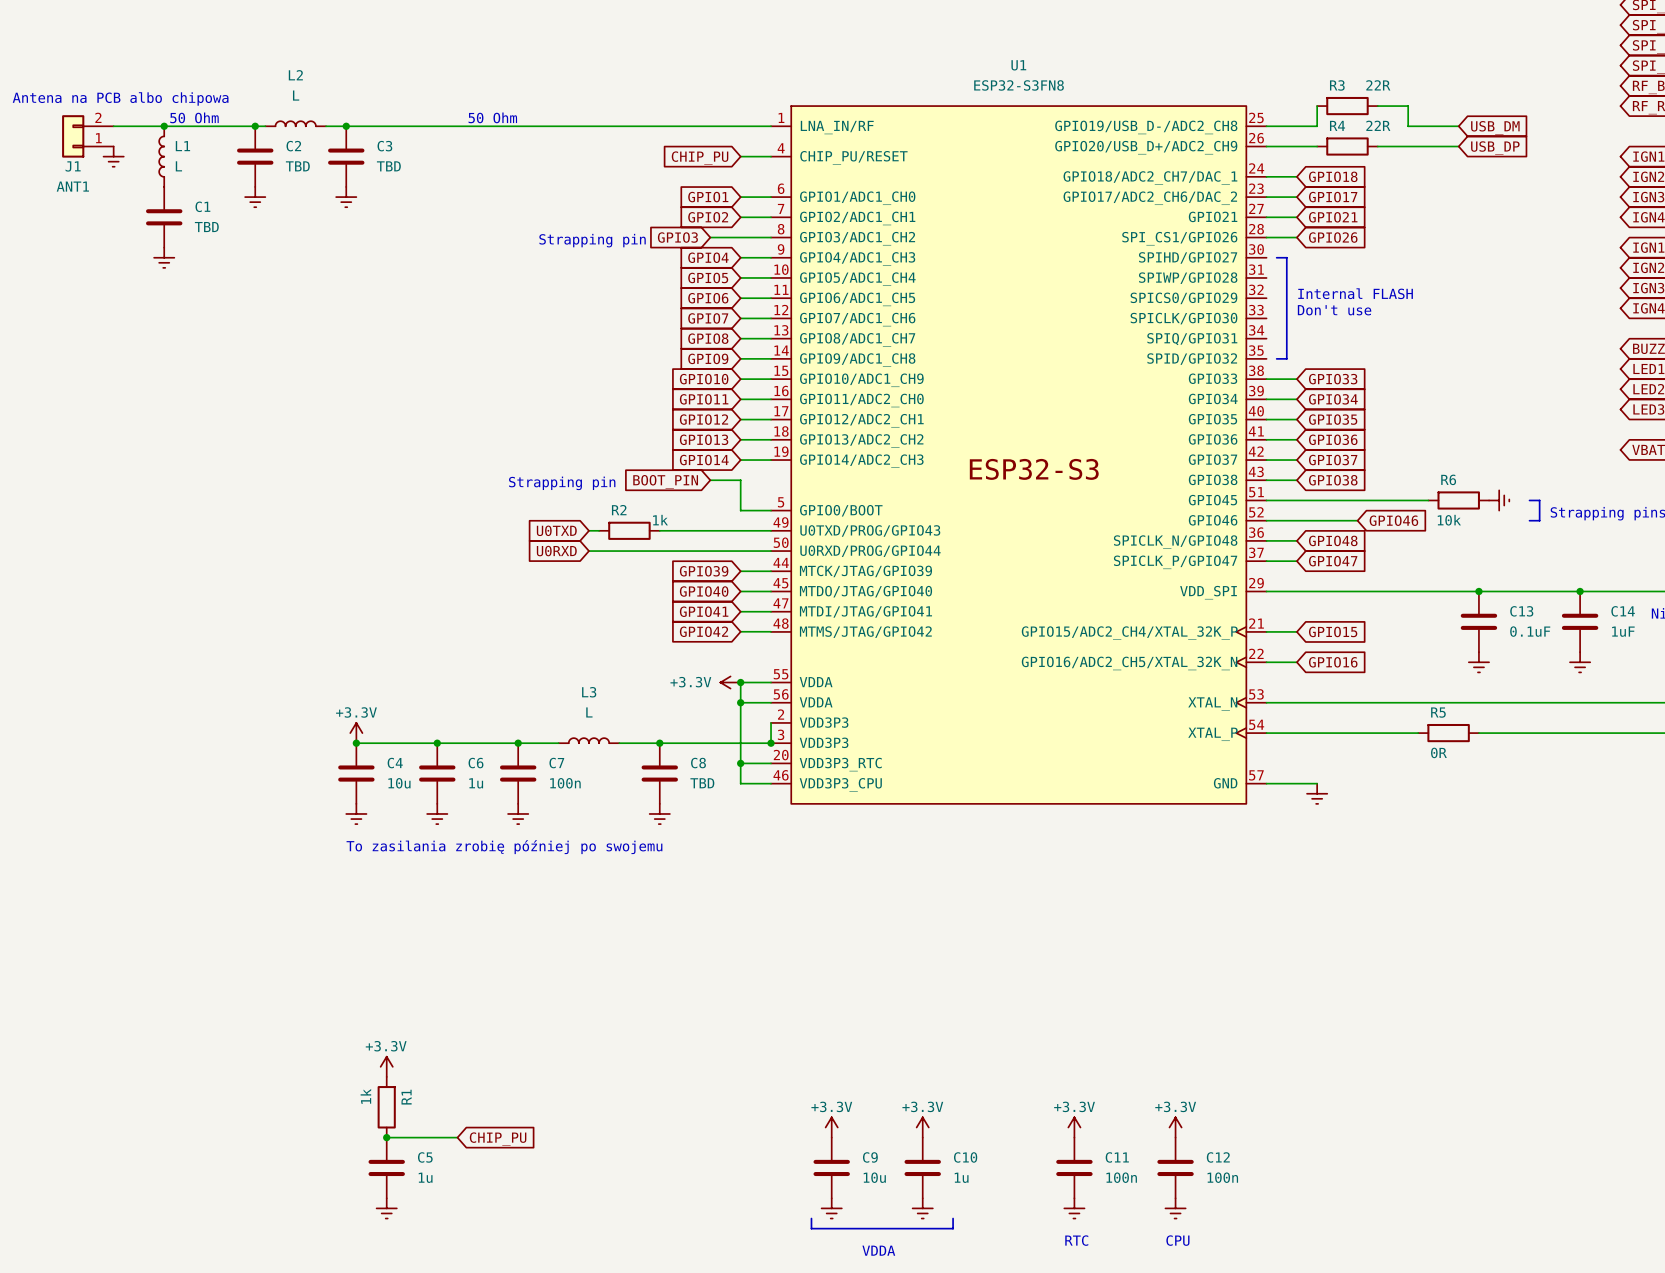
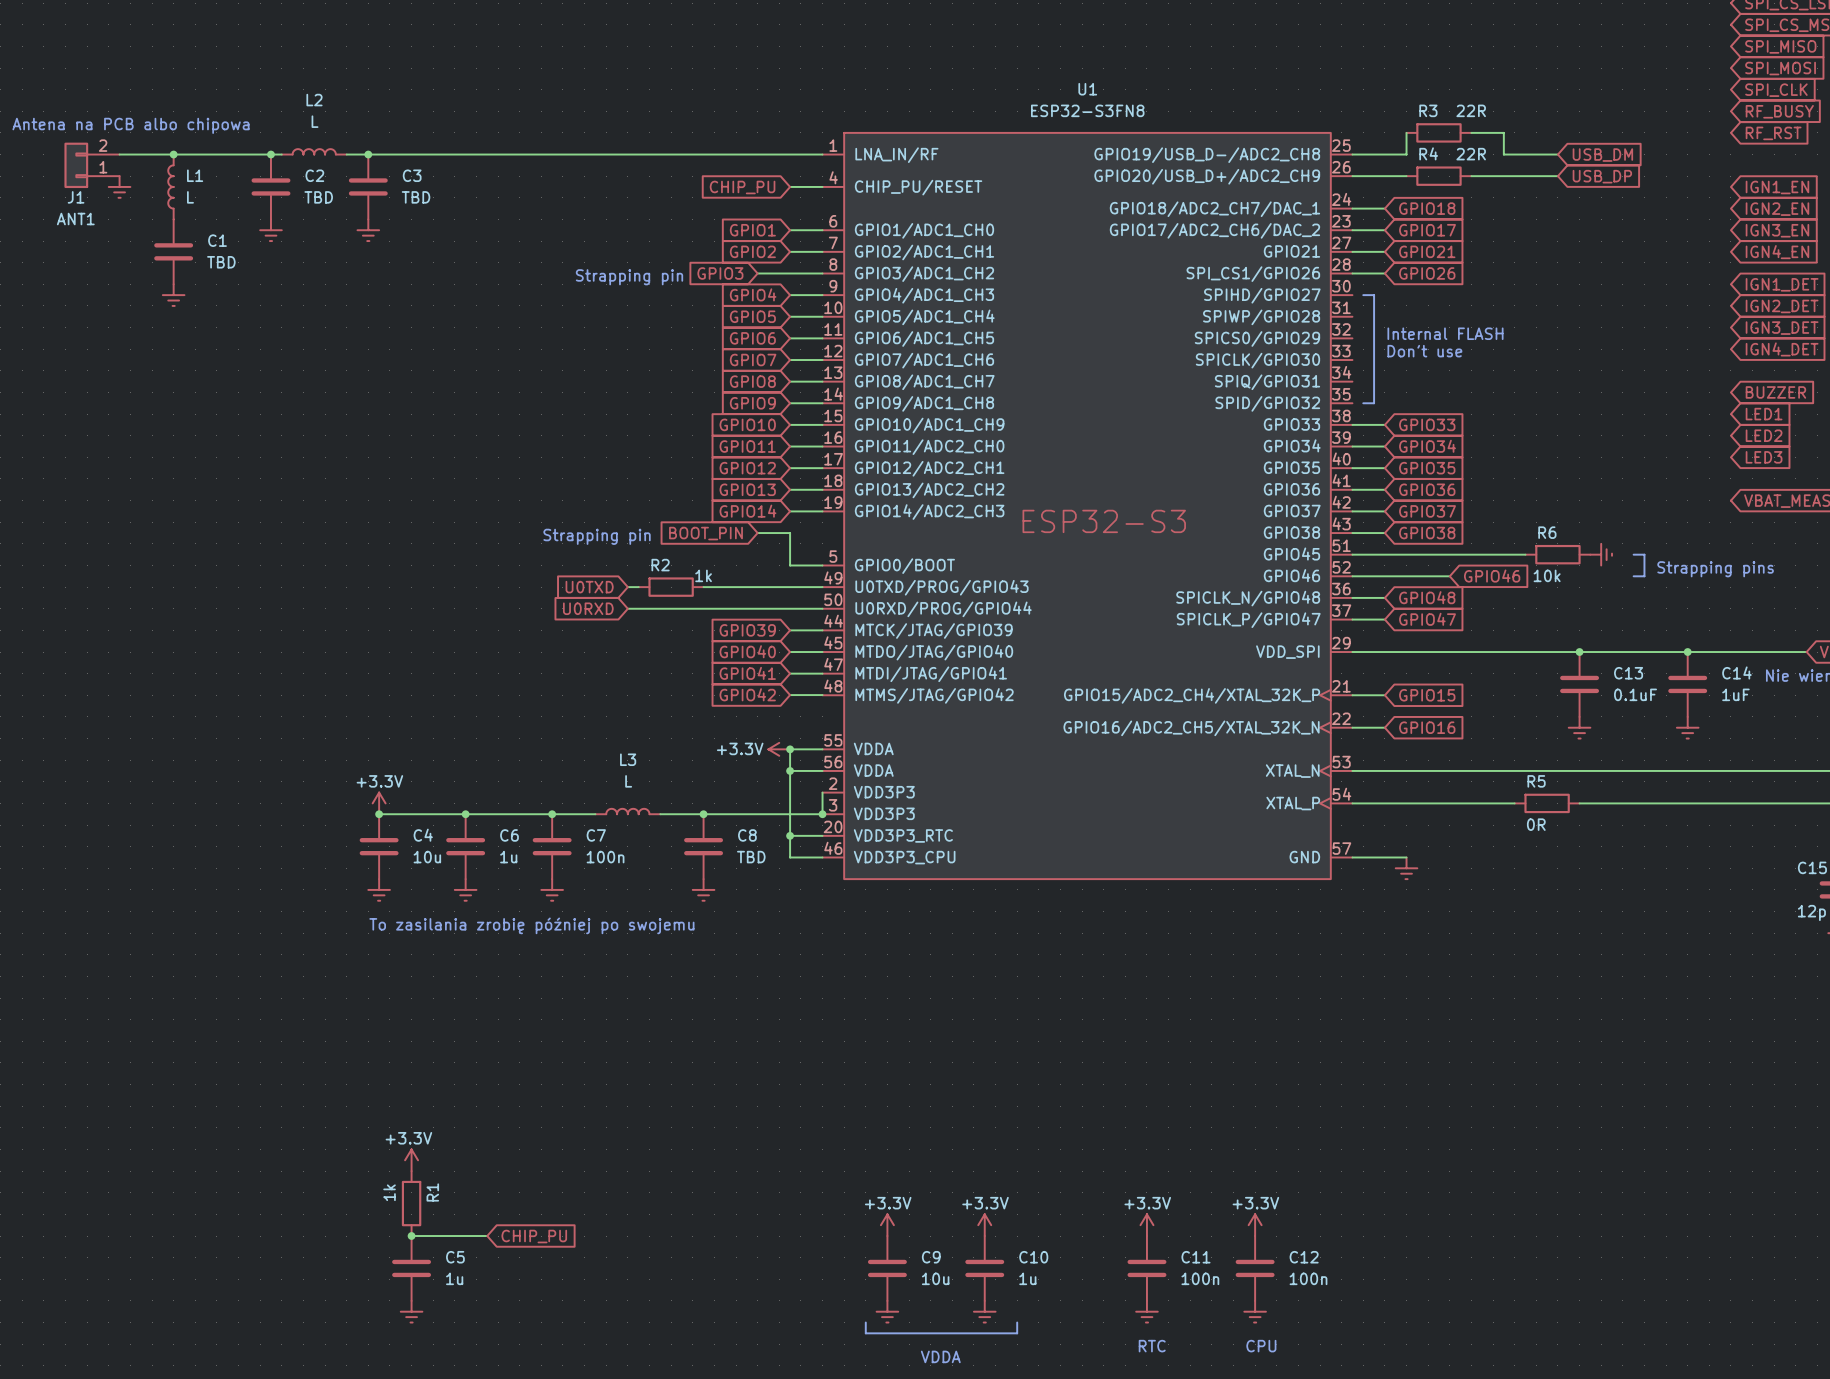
text: 50 Ohm (194, 117) -> none
text: 50 Ohm (492, 117) -> none

